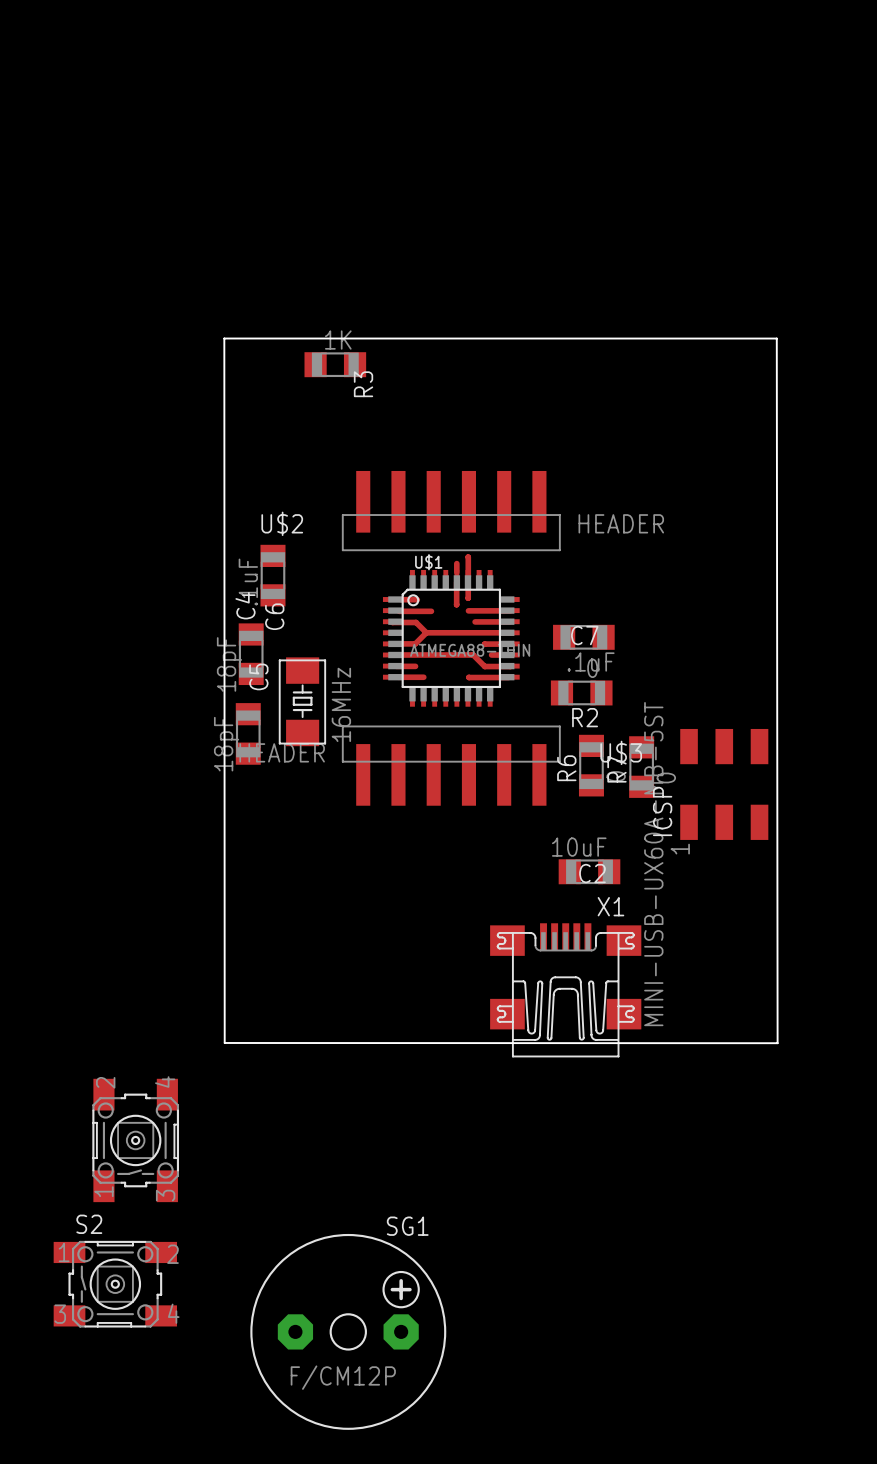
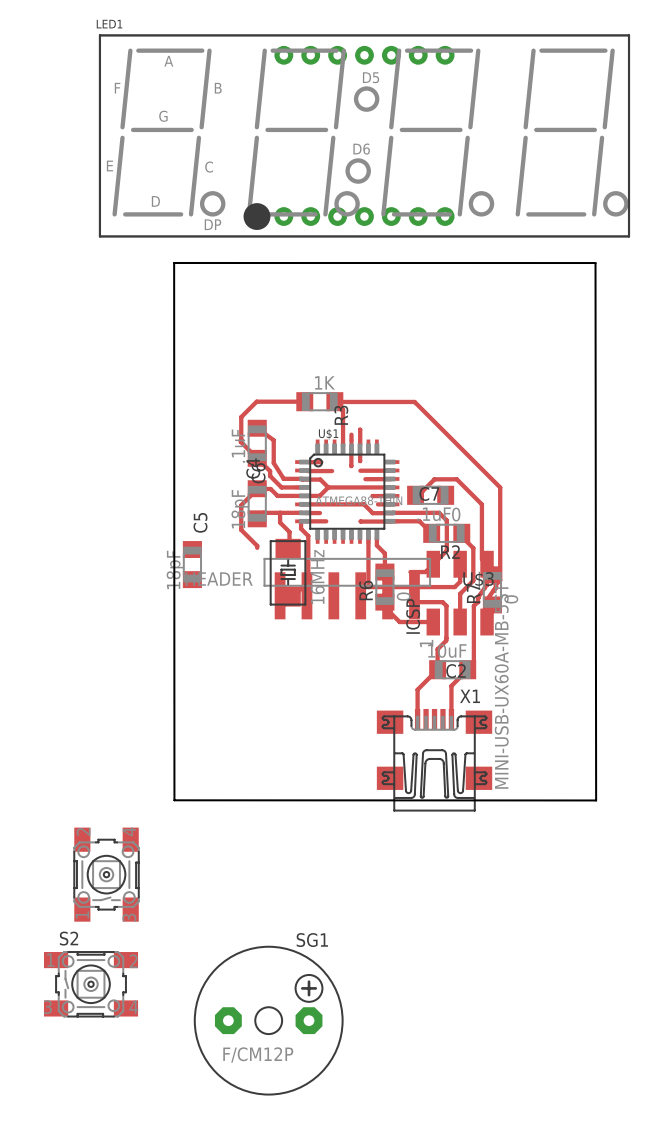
LED1: none -> (364, 135)
R3 position: (335, 364) -> (319, 401)
U$2: HEADER (451, 511) -> none
top track: none -> (304, 401) (256, 401) (241, 417) (240, 441) (270, 471) (270, 476) (281, 487) (301, 487)
top track: none -> (334, 401) (343, 409) (343, 446)
top track: none -> (335, 401) (414, 401) (500, 487) (500, 580) (495, 584) (495, 588) (487, 599) (487, 622)
top track: none -> (257, 428) (273, 440) (273, 463) (283, 478) (301, 478)
C6 position: (272, 575) -> (257, 443)
top track: none -> (257, 488) (270, 488) (277, 495) (301, 495)
top track: none -> (257, 488) (241, 505) (241, 529) (257, 547)
top track: none -> (411, 491) (422, 491) (434, 479) (456, 479) (481, 504) (481, 559) (487, 564) (487, 584) (478, 597) (478, 602) (473, 605) (473, 663) (451, 685) (451, 719)
C7 position: (583, 637) -> (430, 495)
C4 position: (251, 654) -> (257, 503)
top track: none -> (280, 512) (280, 522) (289, 531) (288, 548)
top track: none -> (301, 512) (263, 512) (257, 518)
top track: none -> (392, 512) (439, 512) (446, 521)
top track: none -> (446, 521) (446, 550) (425, 572) (410, 572)
top track: none -> (301, 521) (301, 528) (308, 536) (308, 581) (293, 596) (288, 596)
top track: none -> (393, 521) (419, 521) (433, 535)
top track: none -> (461, 533) (461, 536) (473, 548) (473, 580) (460, 593) (460, 622)
top track: none -> (368, 537) (368, 587) (454, 587) (460, 581) (460, 564)
top track: none -> (376, 537) (376, 545) (384, 553) (384, 572)
part position: (302, 701) -> (288, 572)
R6 position: (591, 765) -> (384, 587)
top track: none -> (410, 602) (442, 602) (446, 605) (446, 640) (437, 649) (437, 669) (417, 689) (417, 719)
top track: none -> (380, 603) (399, 622) (433, 622)
ICSP position: (724, 784) -> (460, 593)

